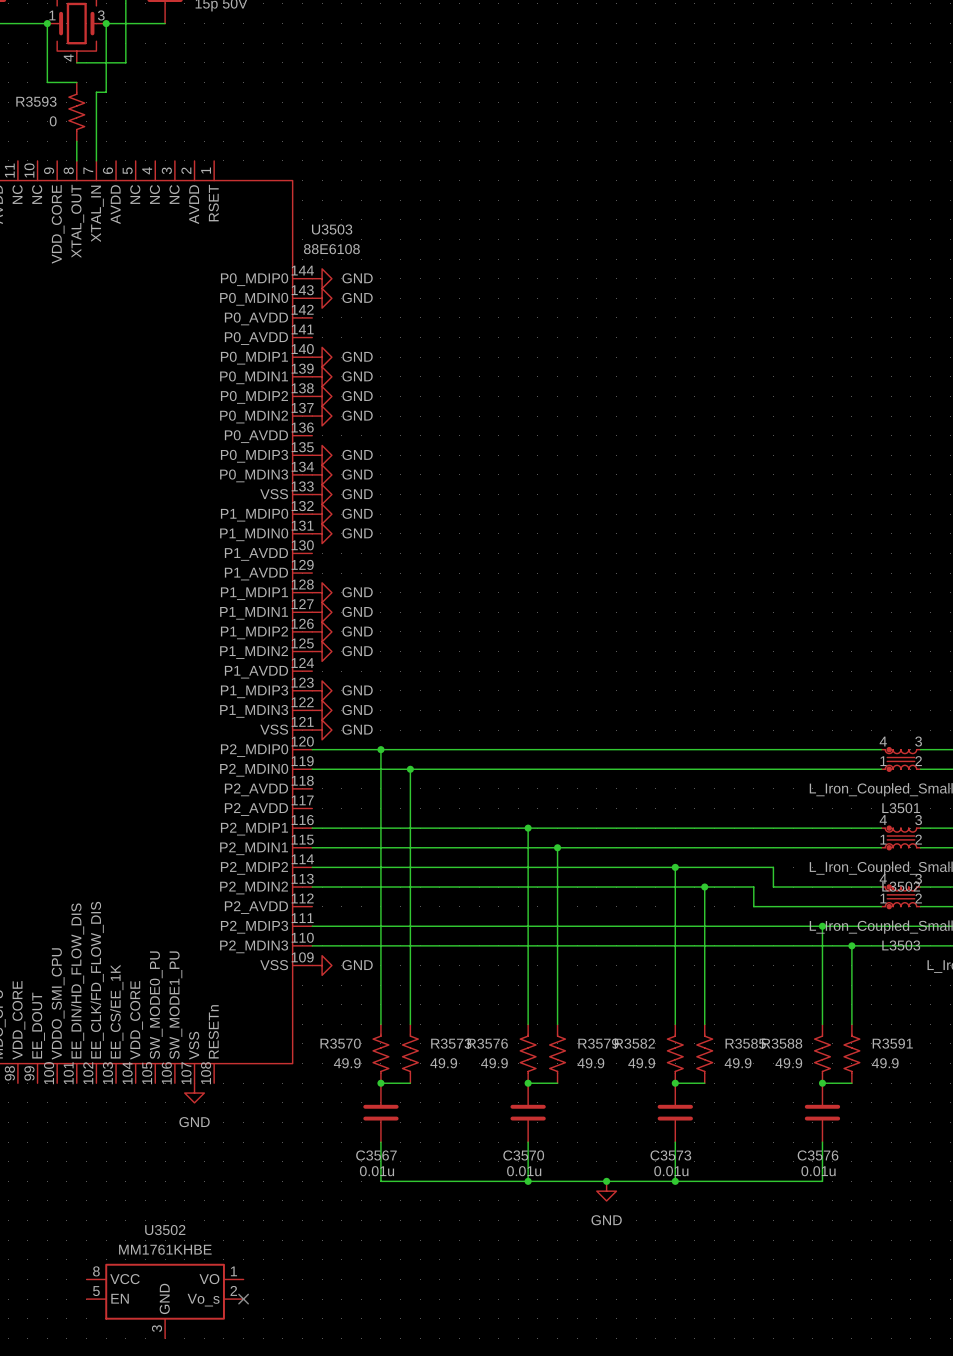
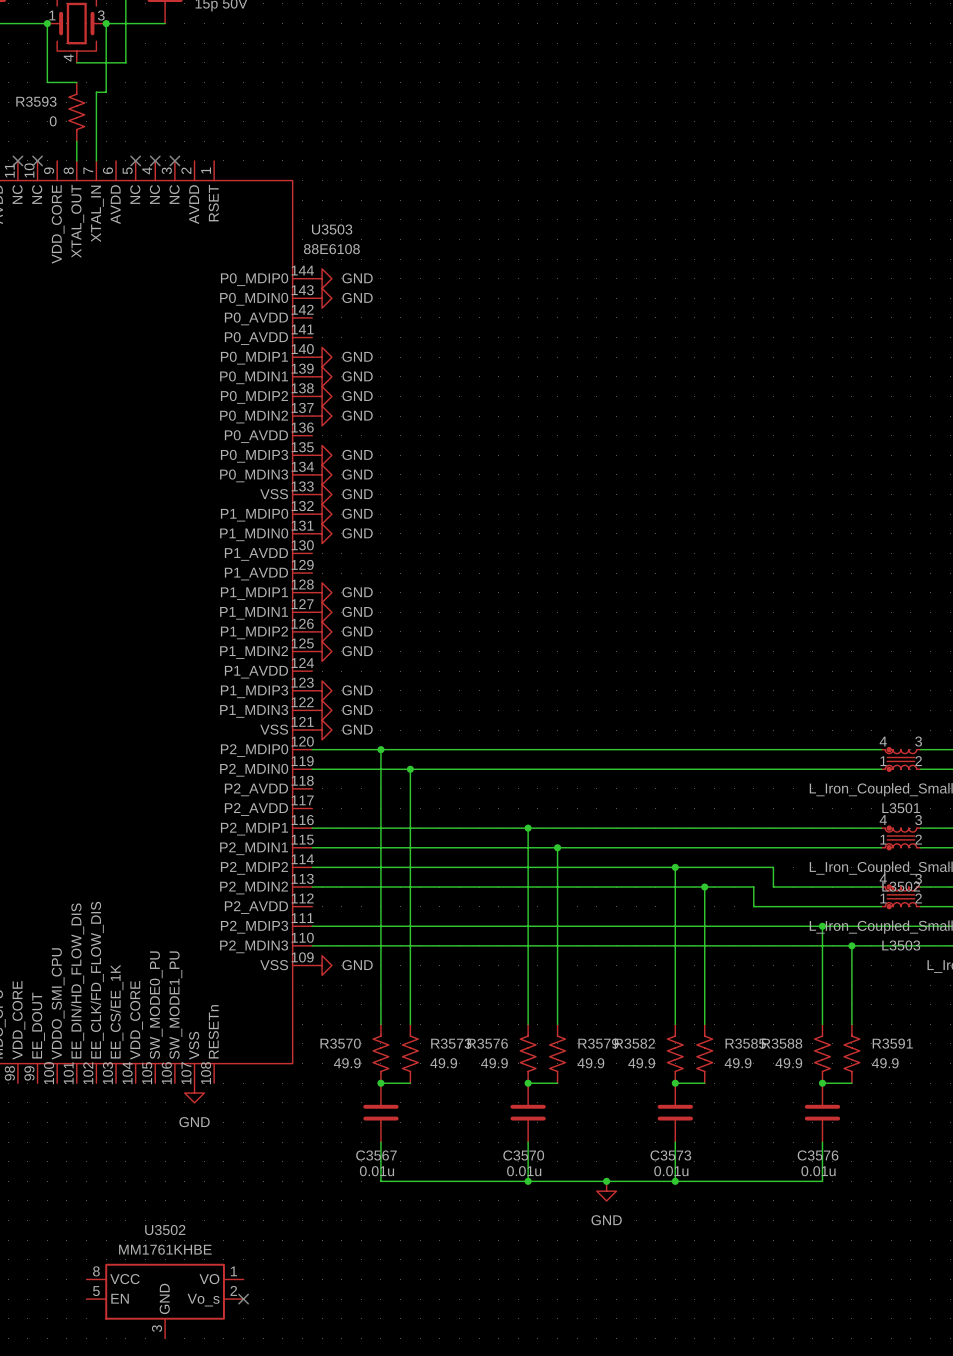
no-connect mark: none -> (17, 160)
no-connect mark: none -> (37, 160)
no-connect mark: none -> (135, 160)
no-connect mark: none -> (155, 160)
no-connect mark: none -> (174, 160)

